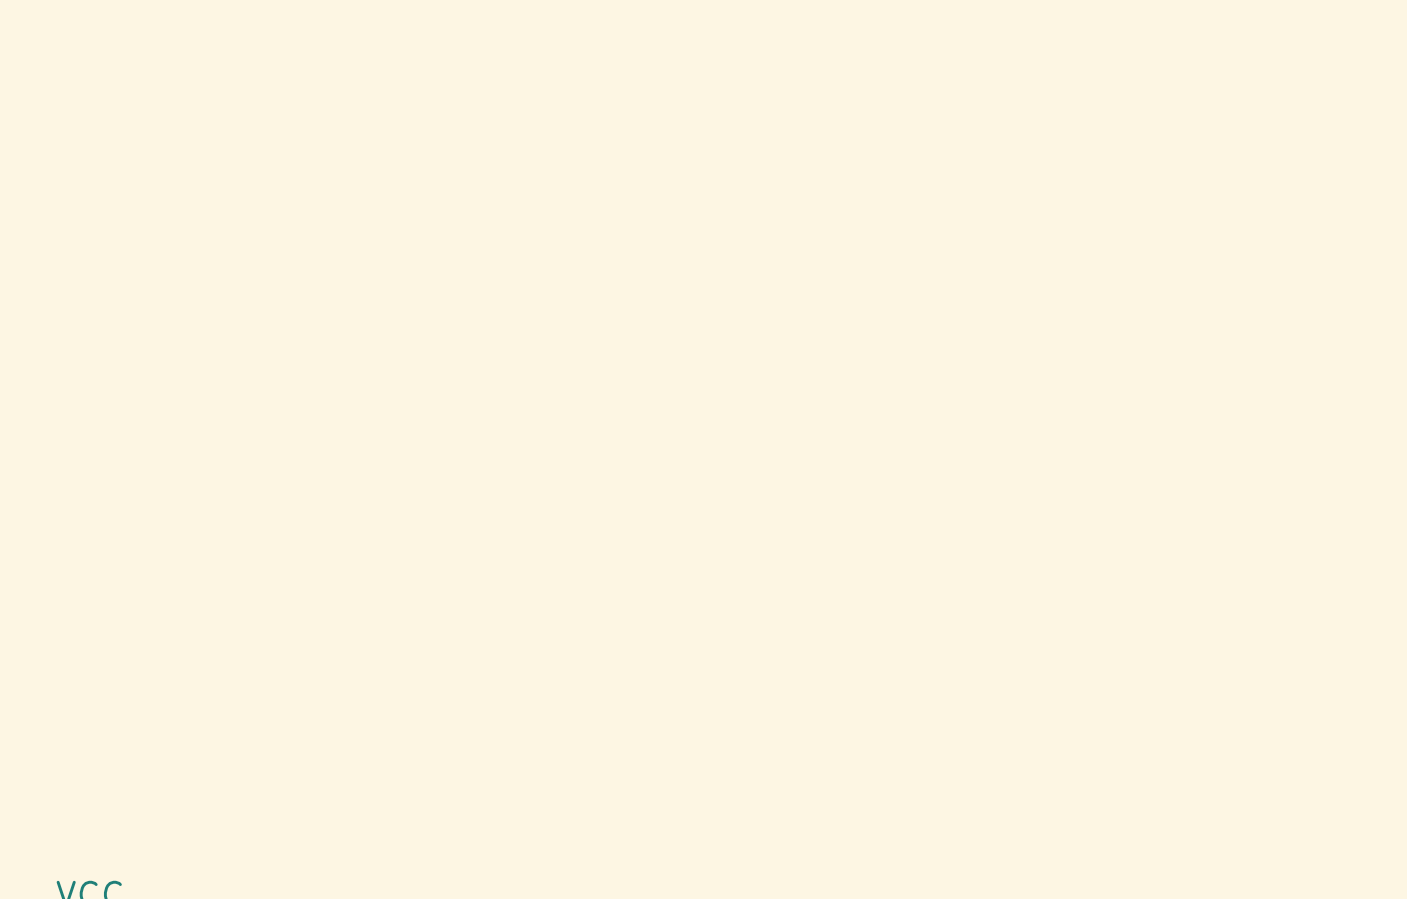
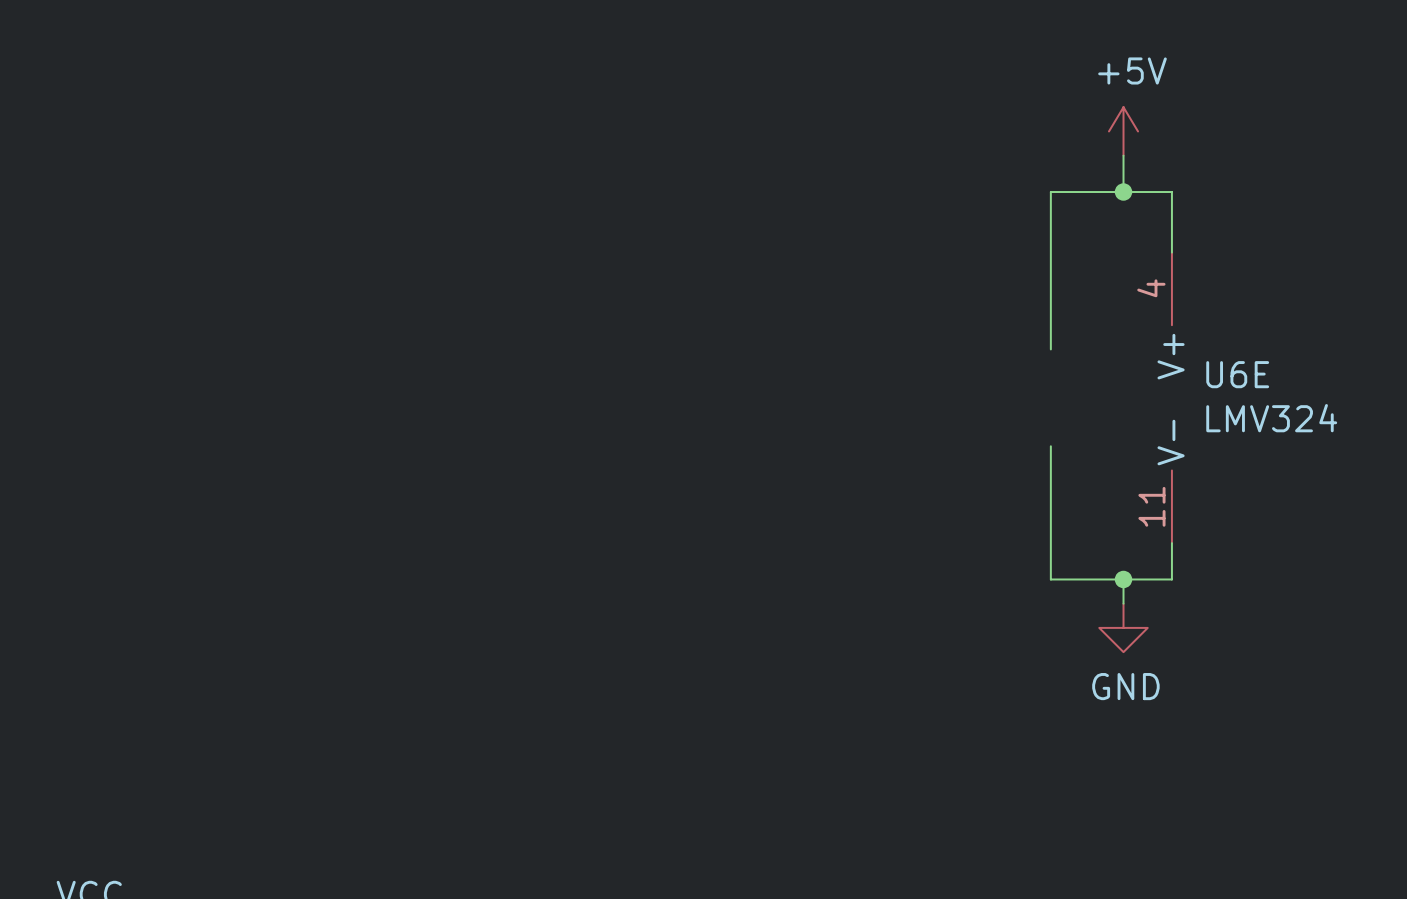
power symbol: none -> +5V (1123, 131)
wire: none -> (1123, 155) (1123, 192)
junction: none -> (1123, 192)
wire: none -> (1171, 252) (1171, 192) (1050, 192) (1050, 349)
U6E: none -> LMV324 (1171, 397)
wire: none -> (1050, 446) (1050, 579) (1171, 579) (1171, 543)
wire: none -> (1123, 579) (1123, 603)
junction: none -> (1123, 579)
power symbol: none -> GND (1123, 627)

